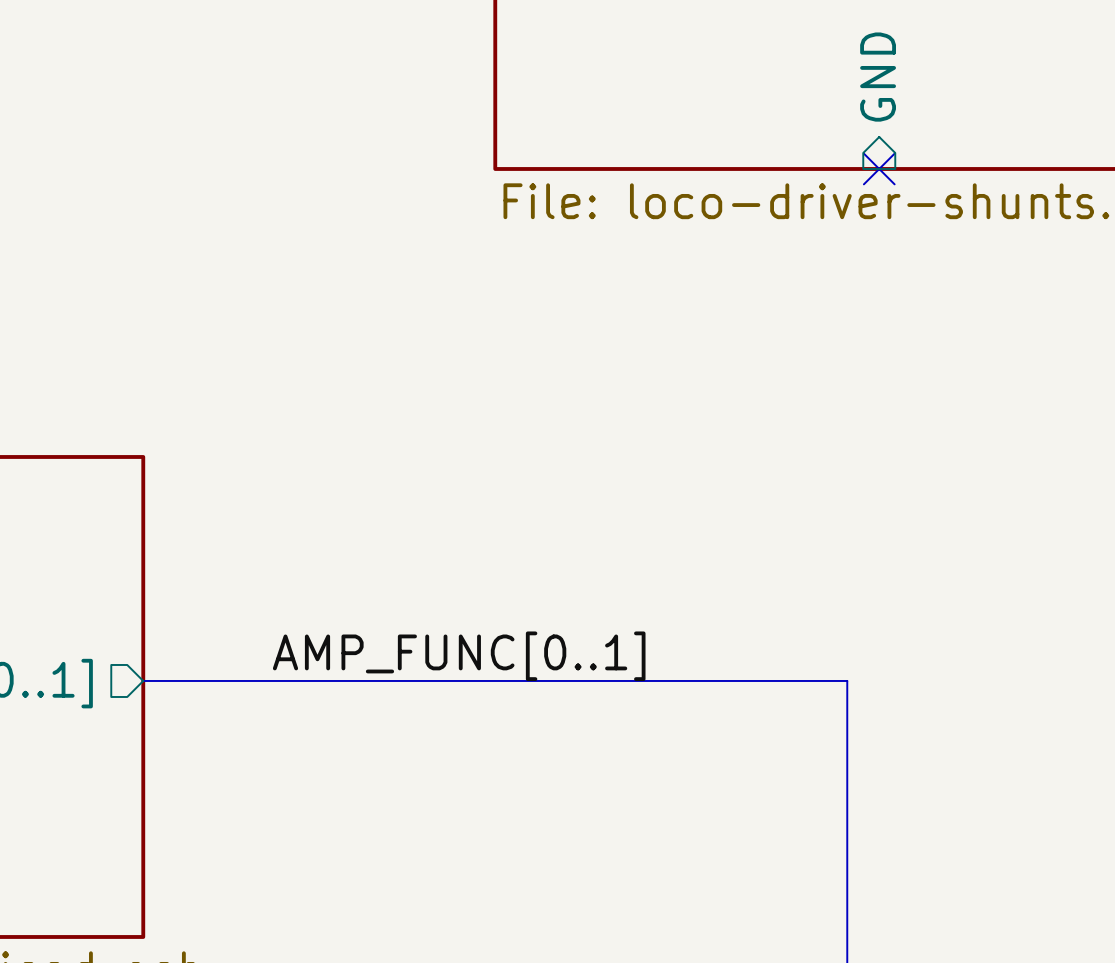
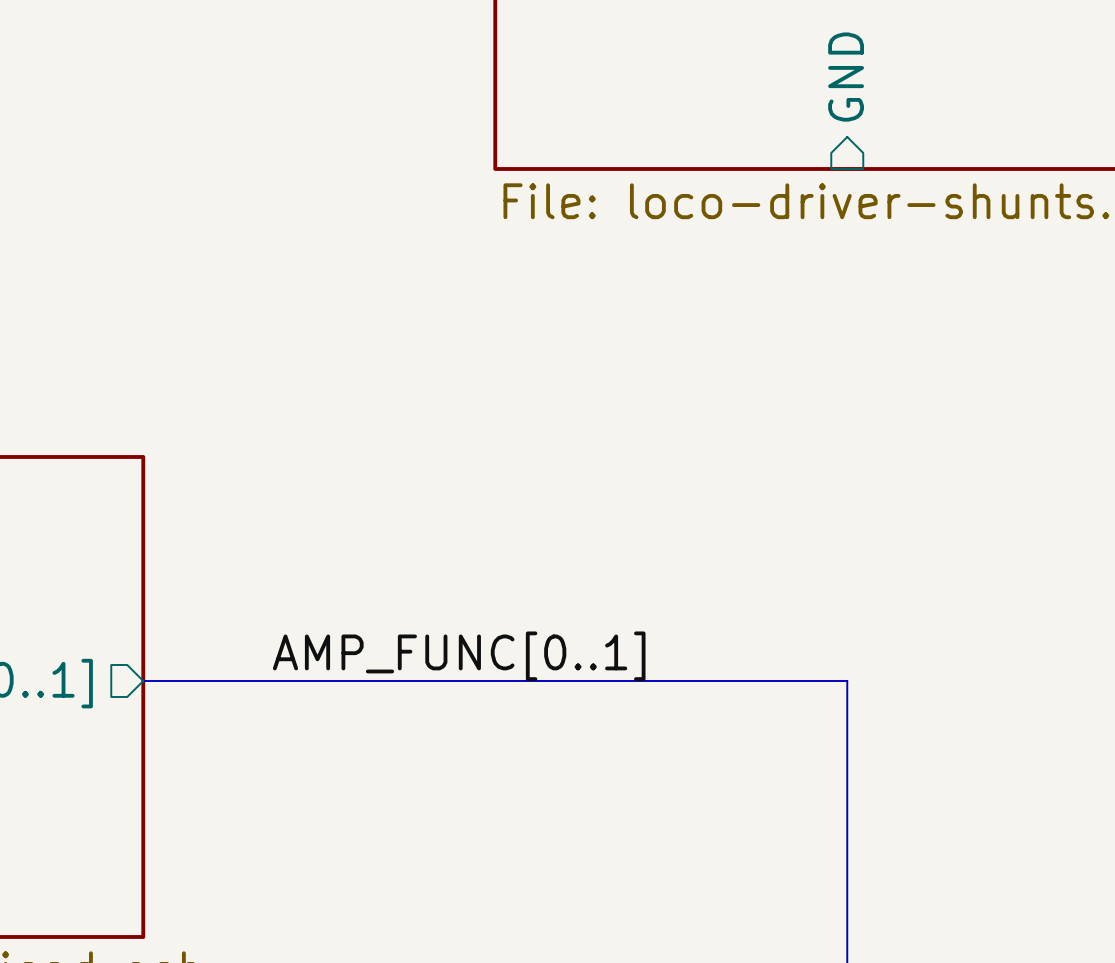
sheet pin position: GND (878, 77) -> GND (846, 77)
no-connect mark: (879, 168) -> none

